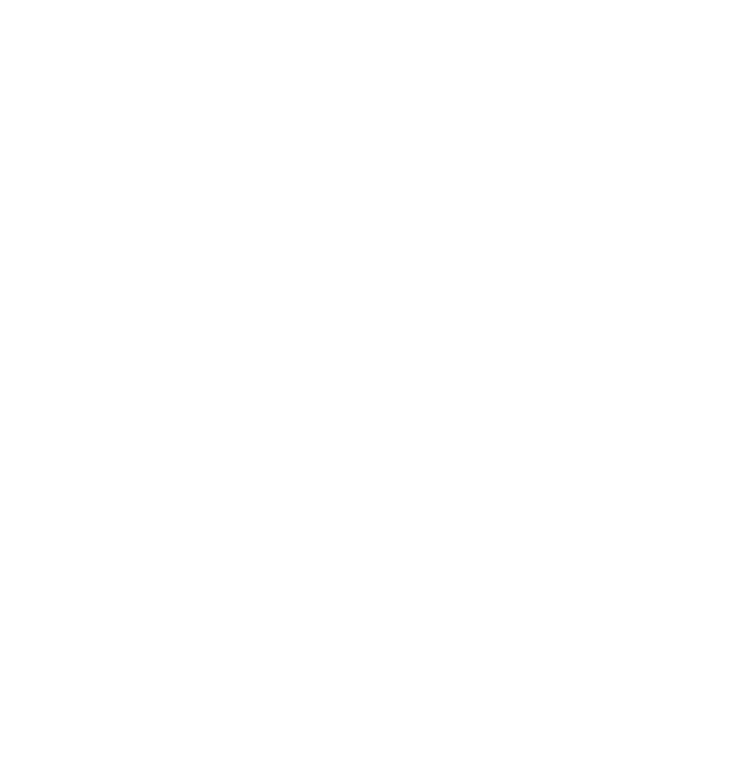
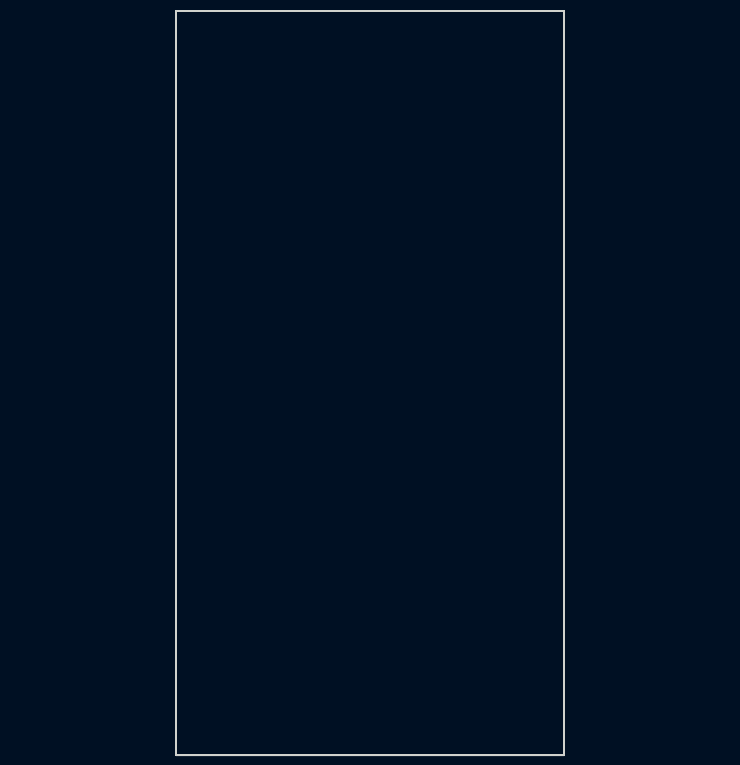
part: none -> (370, 383)

